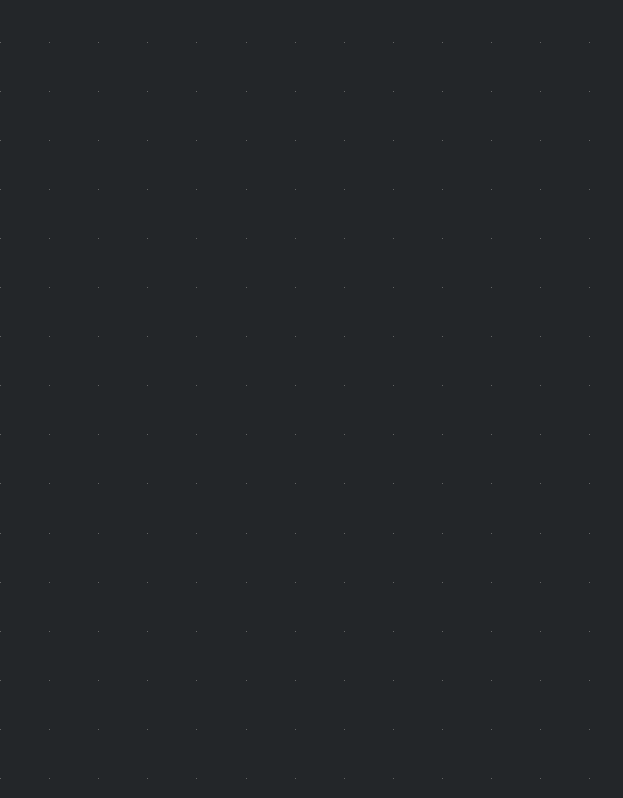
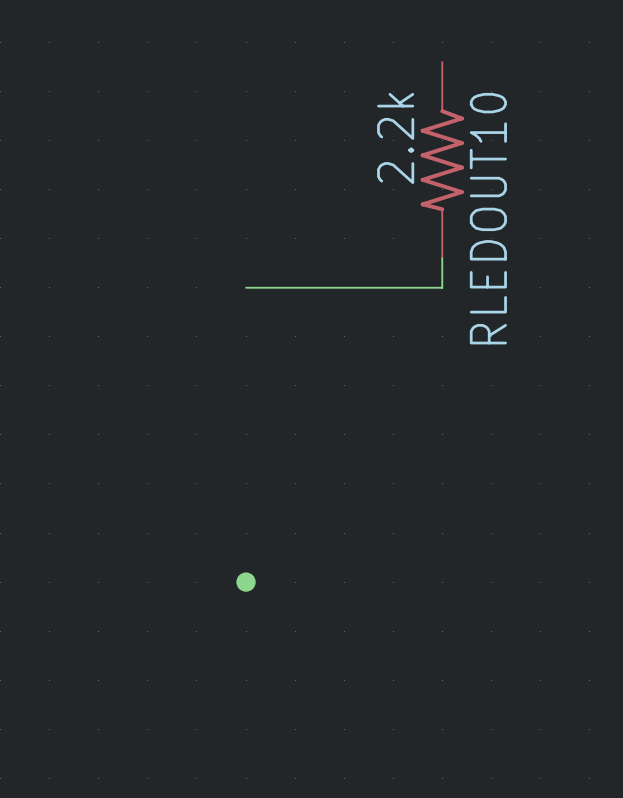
RLEDOUT10: none -> 2.2k (442, 160)
wire: none -> (442, 258) (442, 287) (246, 287)
junction: none -> (246, 582)

